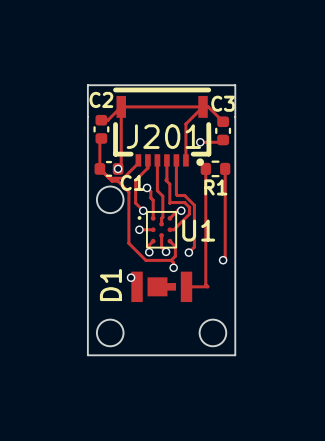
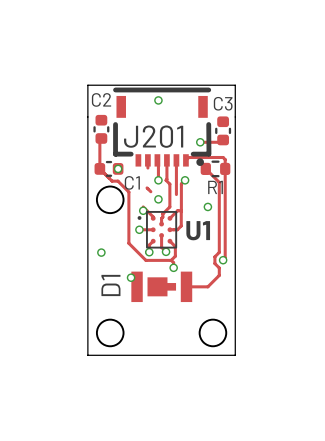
via: none -> (158, 100)
track: (121, 106) (121, 165) -> none
track: (121, 106) (208, 106) (223, 121) -> none
track: (121, 106) (107, 120) (101, 120) -> none
track: (203, 106) (185, 123) (185, 160) -> (225, 168) (225, 159) (223, 157) (188, 157) (185, 160)
track: (157, 160) (157, 190) (162, 196) (162, 213) -> (157, 160) (158, 180)
track: (138, 163) (123, 178) (109, 178) -> none
track: (147, 168) (135, 180) (135, 203) (143, 210) -> none
track: (205, 168) (205, 284) (207, 286) -> (205, 168) (219, 182) (219, 252) (214, 256) (214, 263) (219, 267) (219, 275) (207, 286)
via: none -> (158, 180)
track: none -> (185, 180) (181, 184) (181, 211)
via: none -> (185, 180)
via: (147, 187) -> none
track: (150, 191) (150, 197) (153, 200) (153, 216) -> (143, 206) (153, 216)
track: (176, 194) (184, 195) (194, 205) (194, 247) (188, 252) -> none
via: none -> (158, 199)
track: (169, 203) (184, 202) (189, 207) (189, 214) (173, 229) -> (181, 211) (181, 225) (177, 229) (173, 229)
track: none -> (169, 203) (169, 206) (162, 213)
via: none -> (207, 206)
via: (181, 210) -> none
via: none -> (101, 252)
via: (188, 252) -> none

